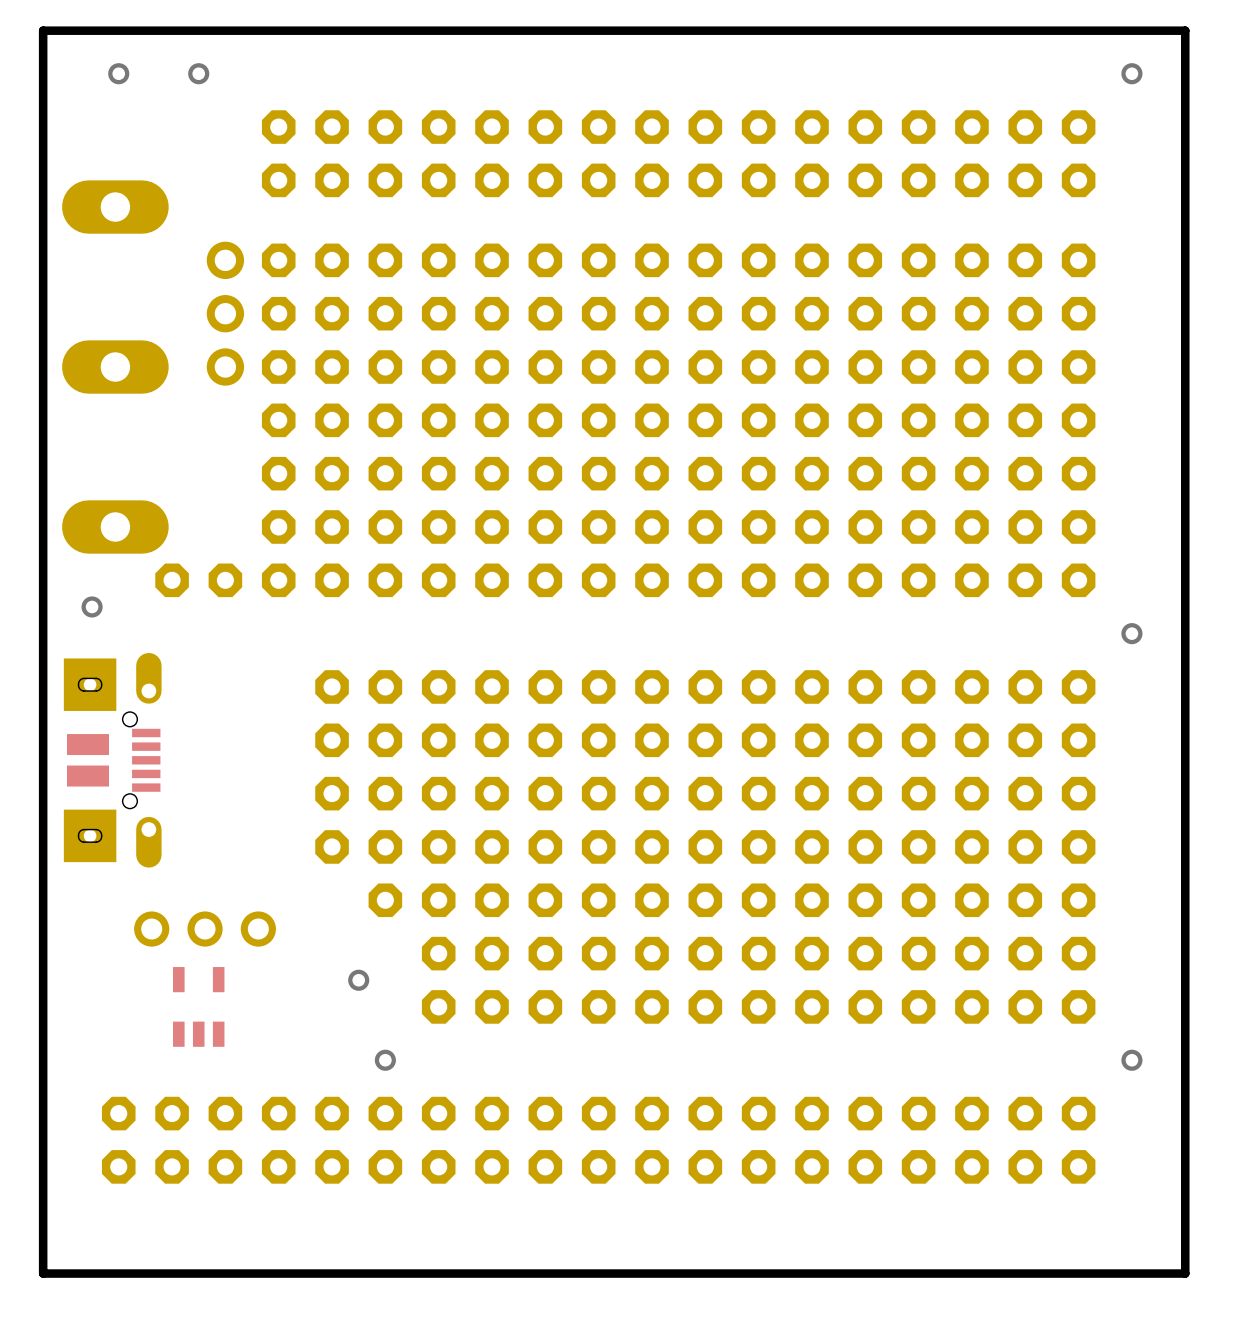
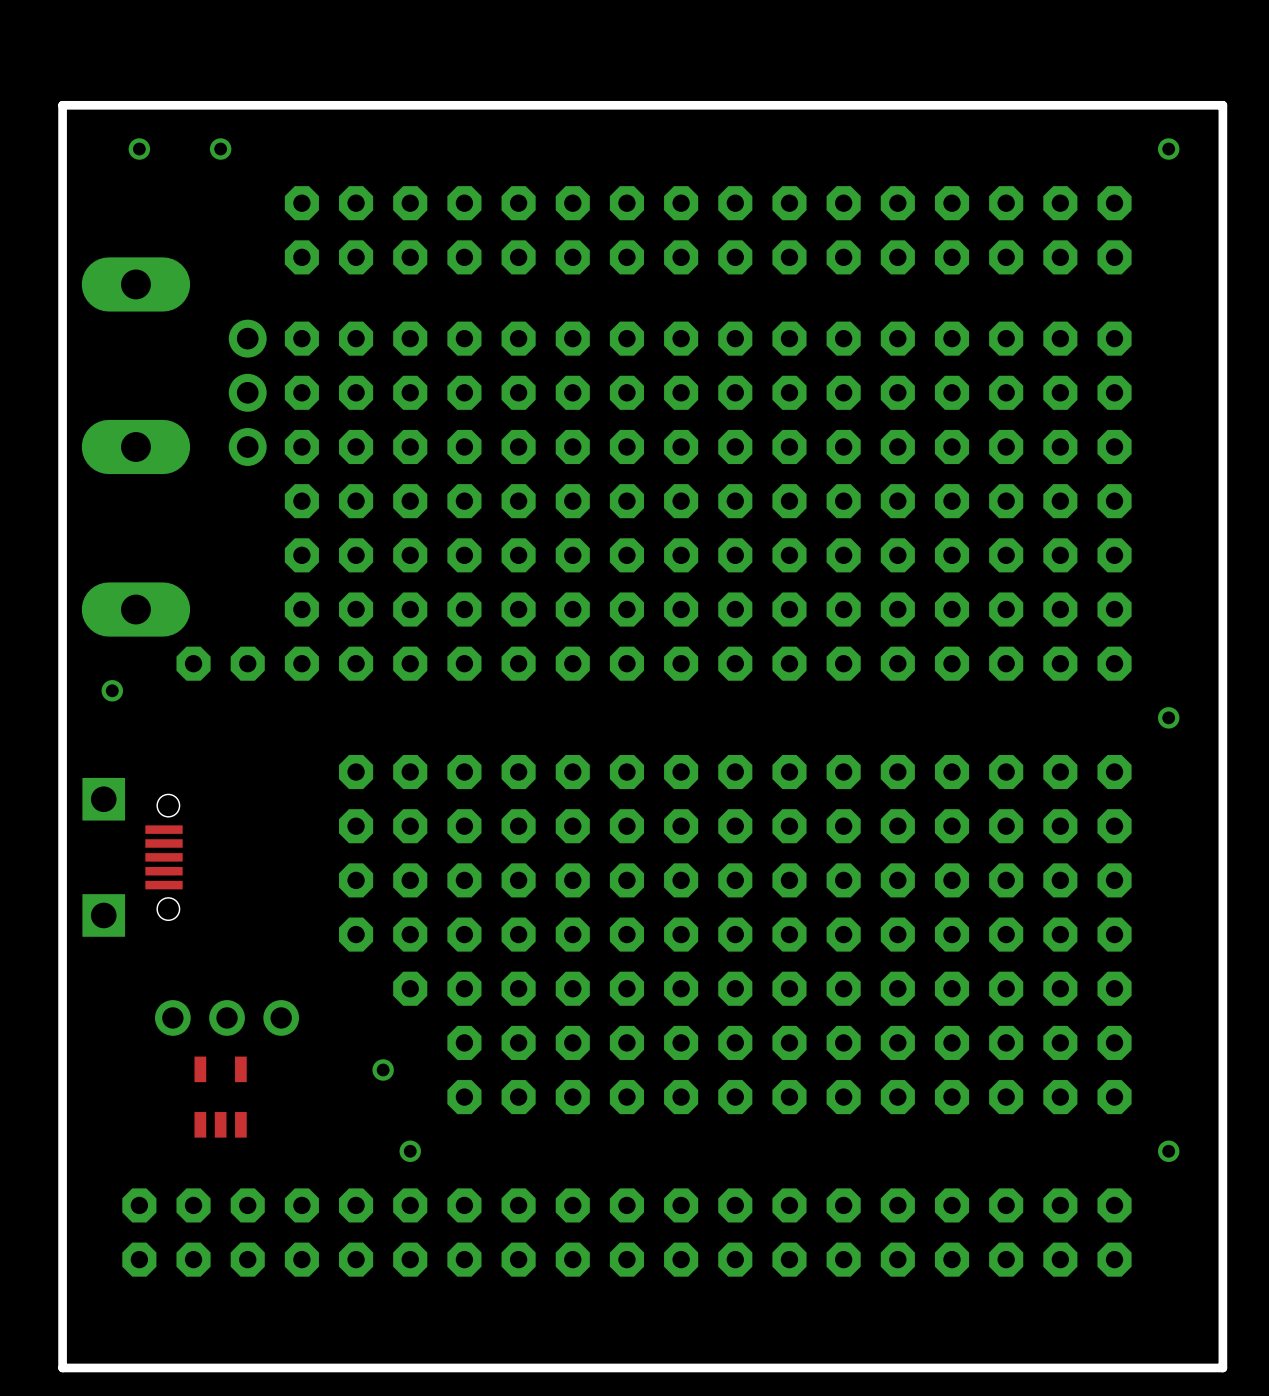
part footprint: [63, 652, 162, 868] -> [82, 777, 183, 937]

